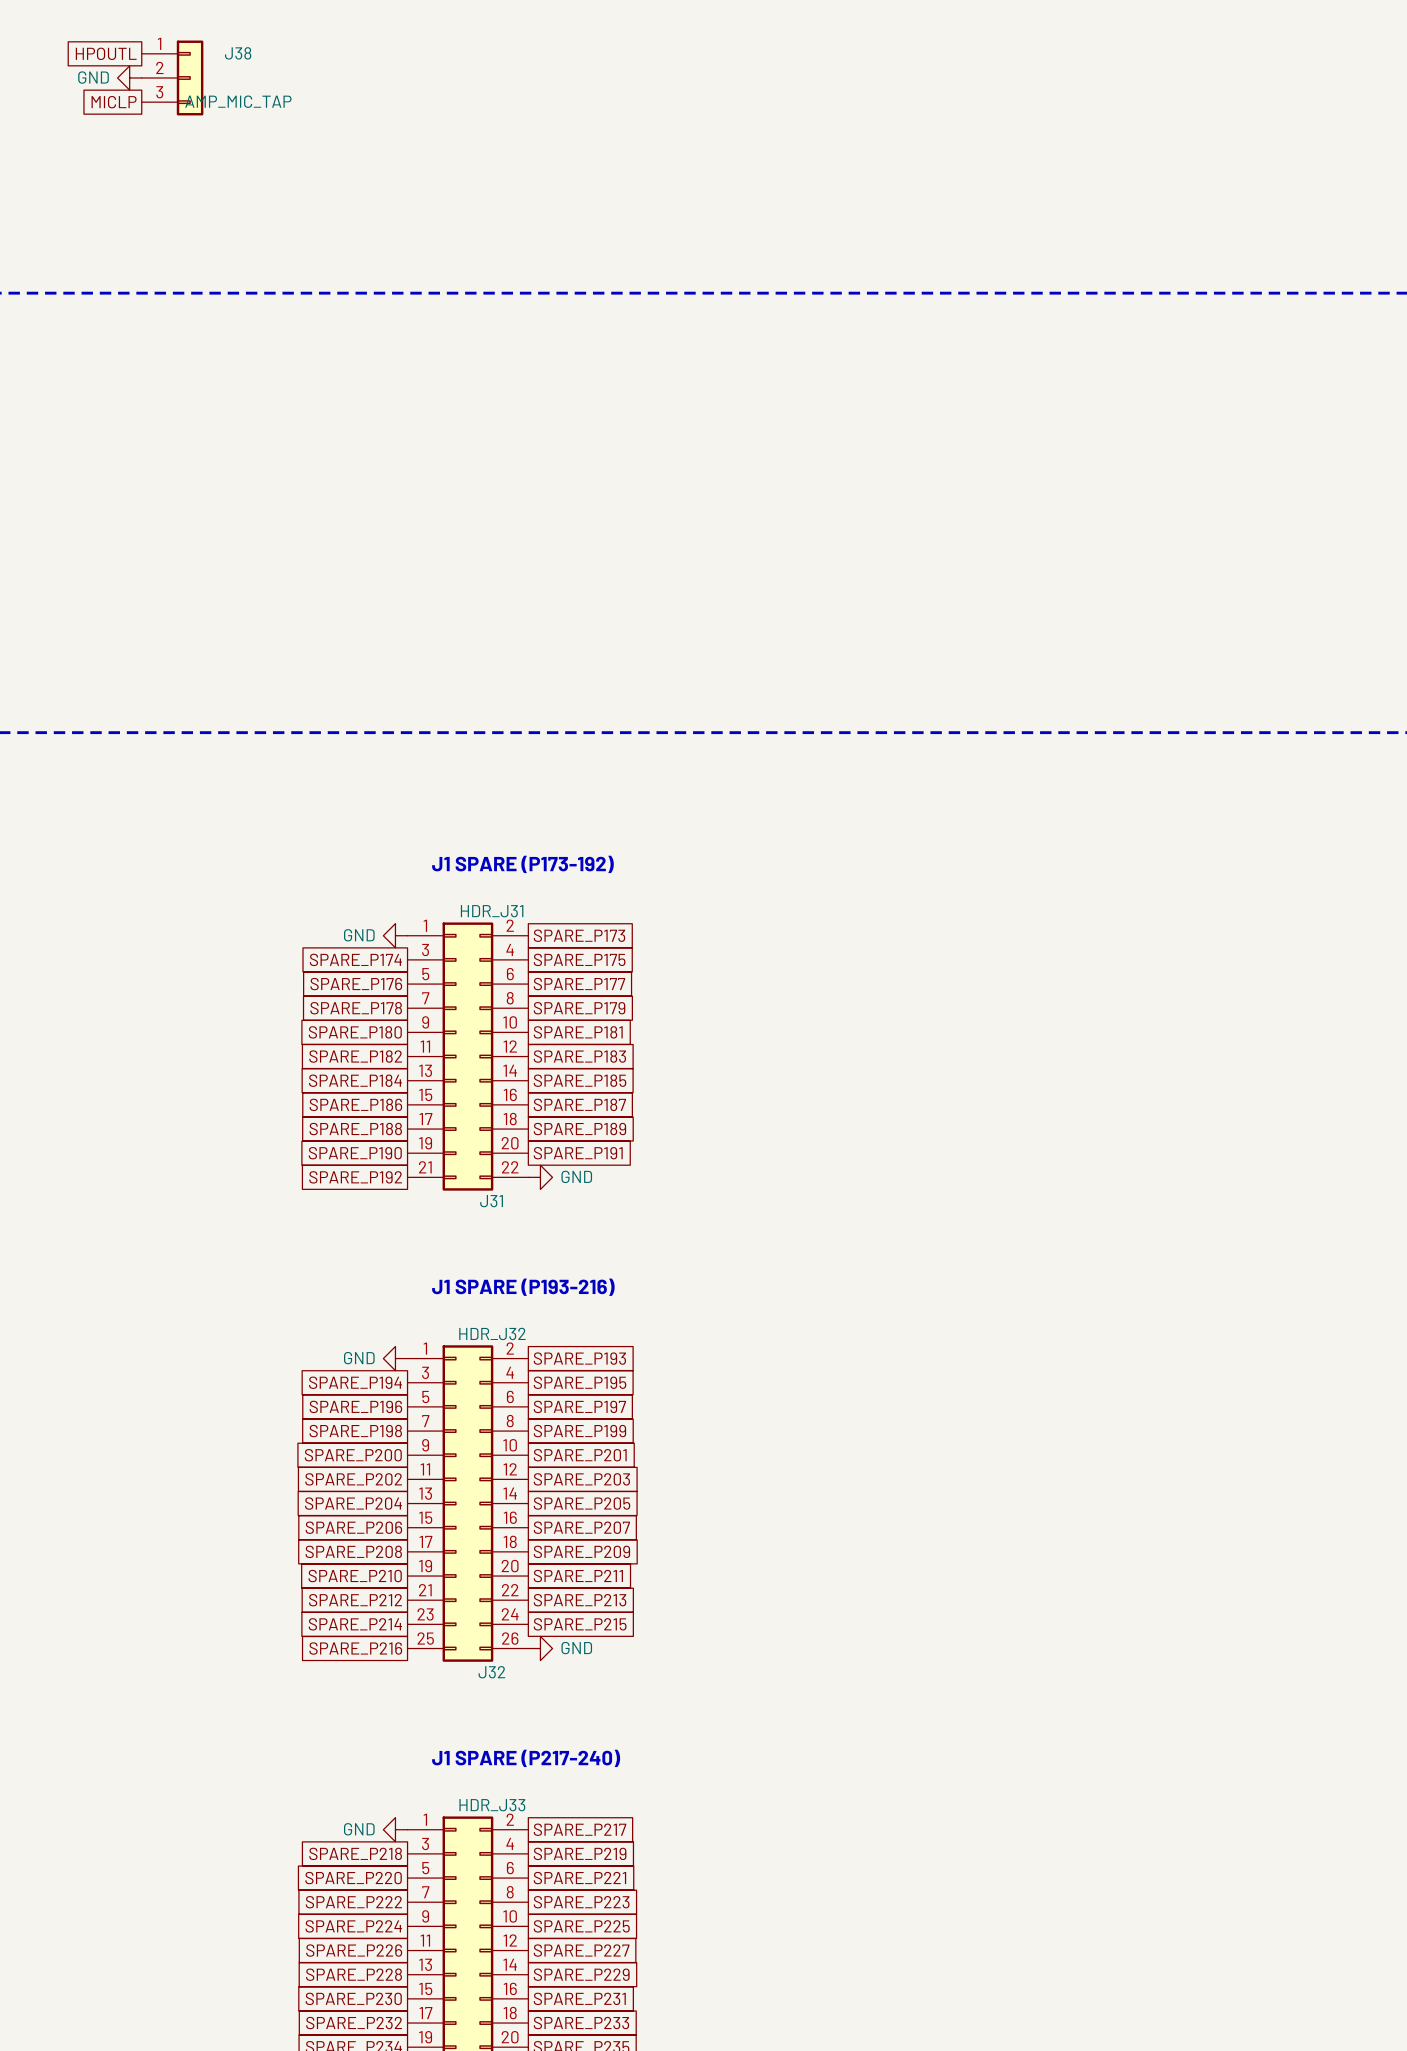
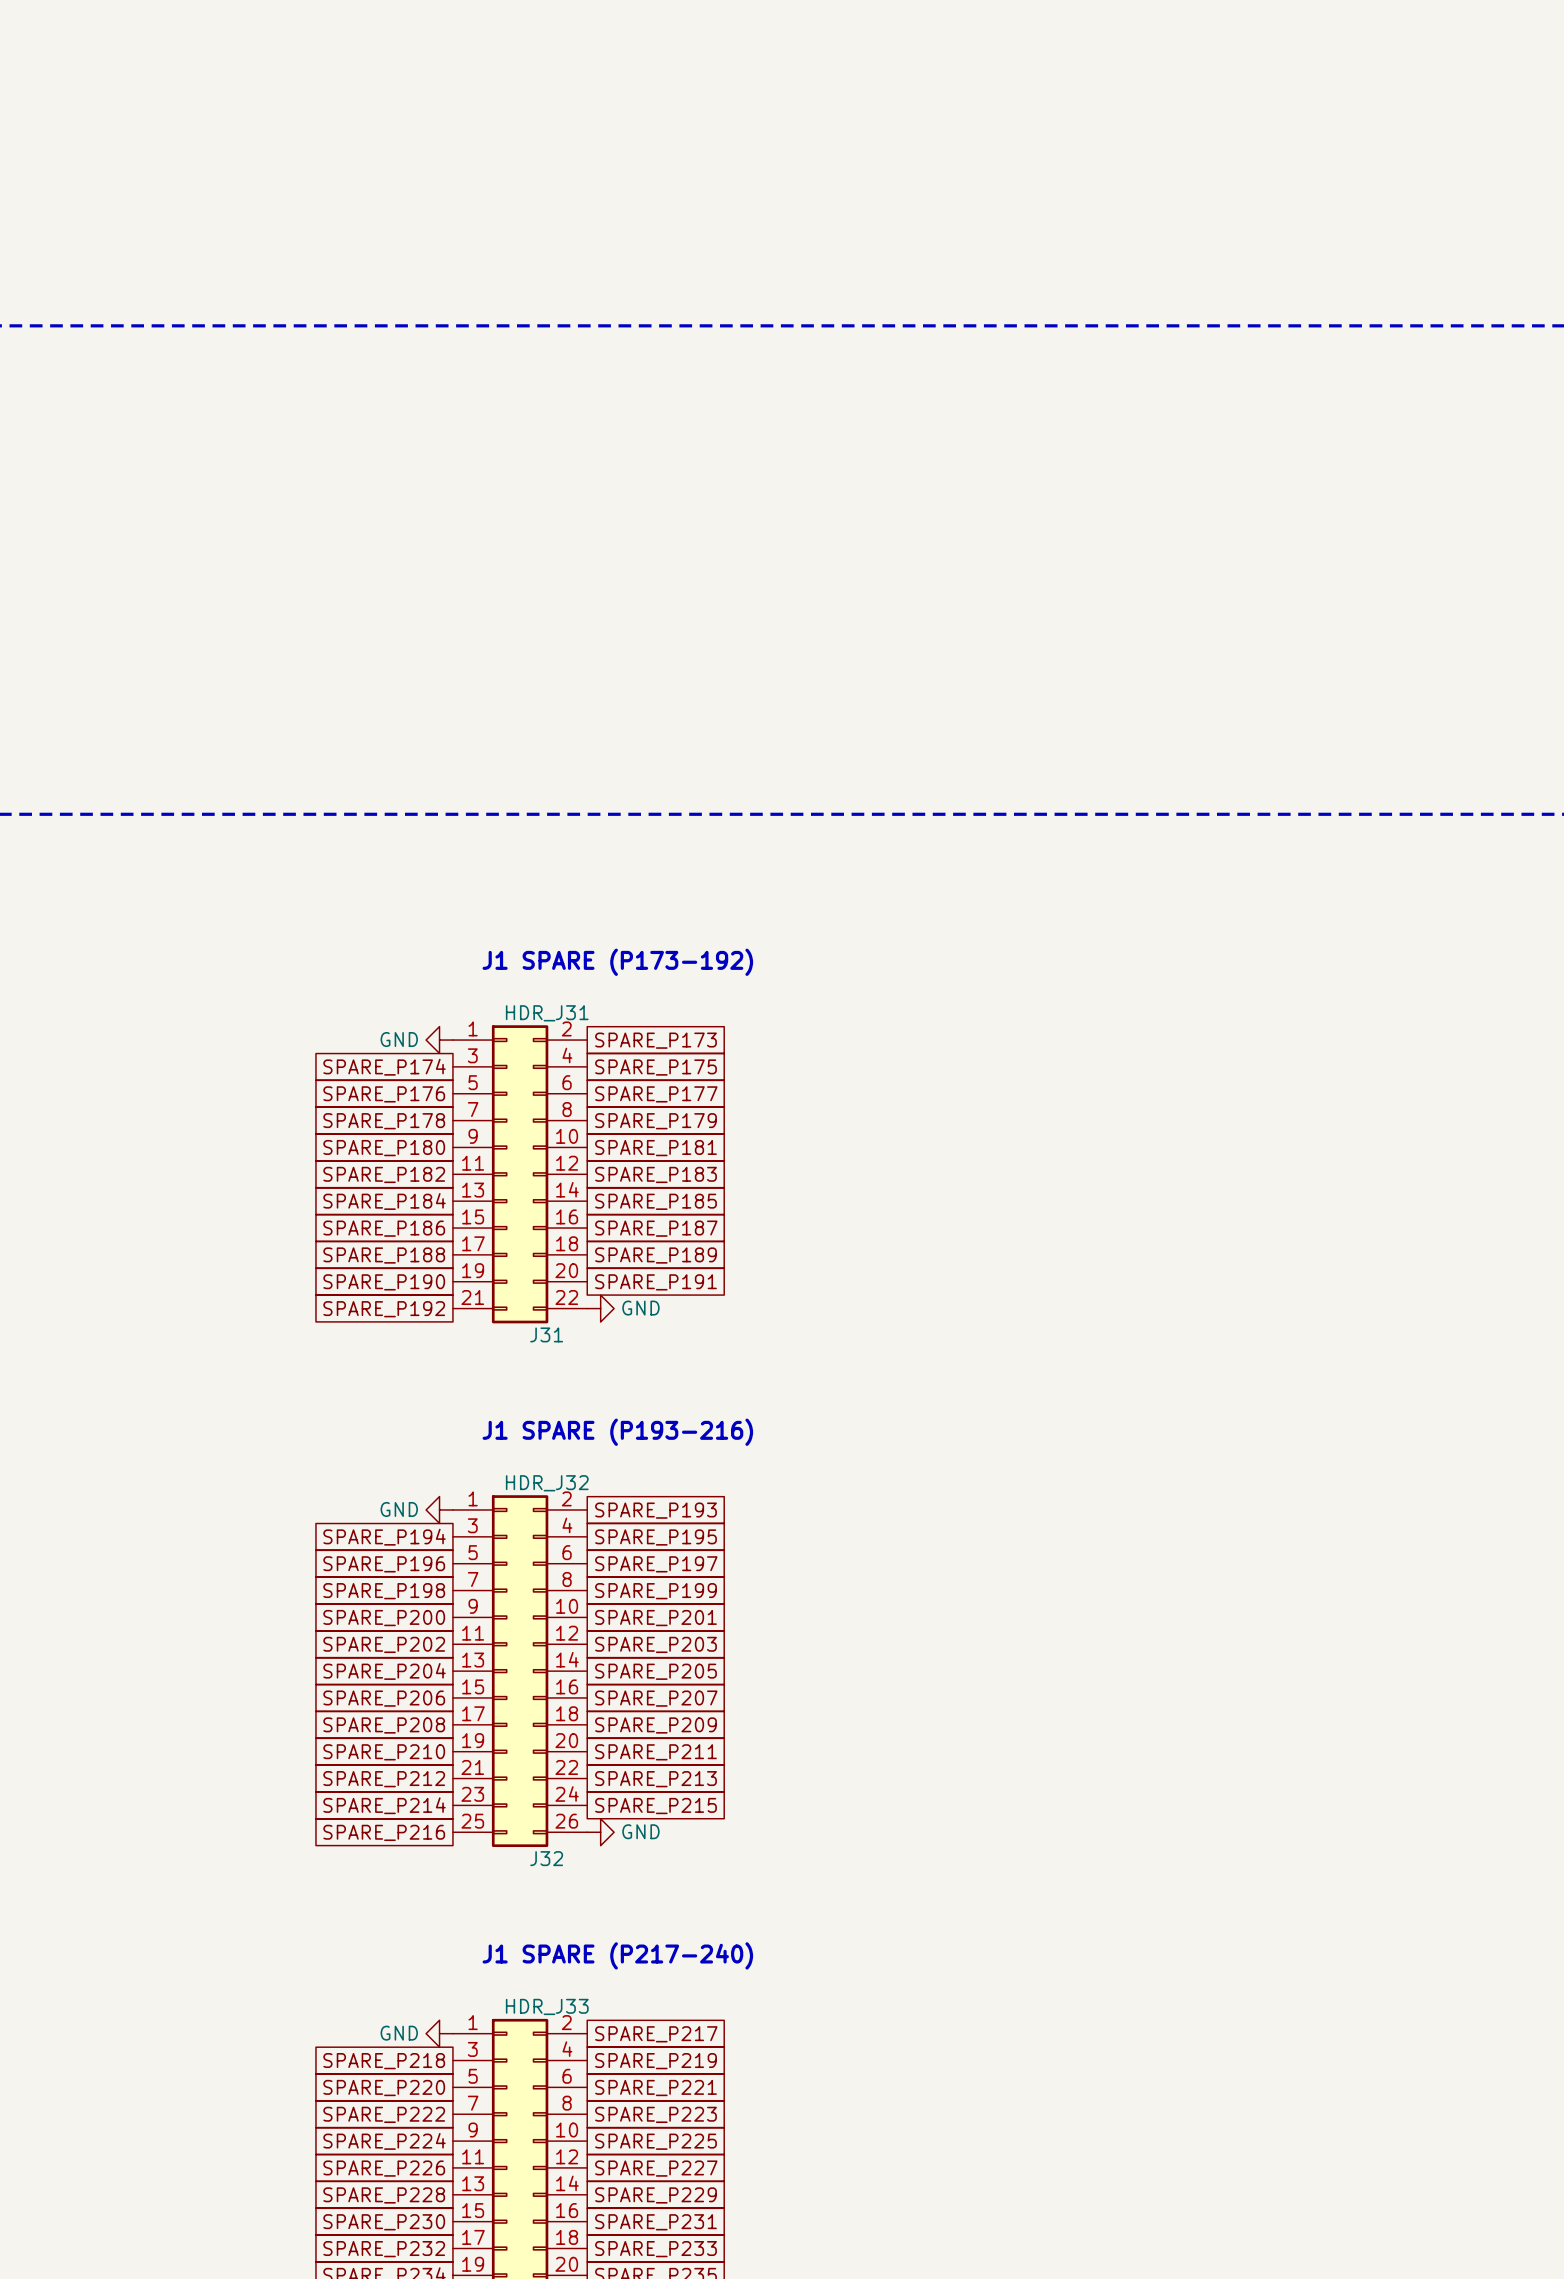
global label: HPOUTL (106, 53) -> none
power symbol: GND (129, 77) -> none
J38: AMP_MIC_TAP (172, 77) -> none
global label: MICLP (114, 102) -> none

